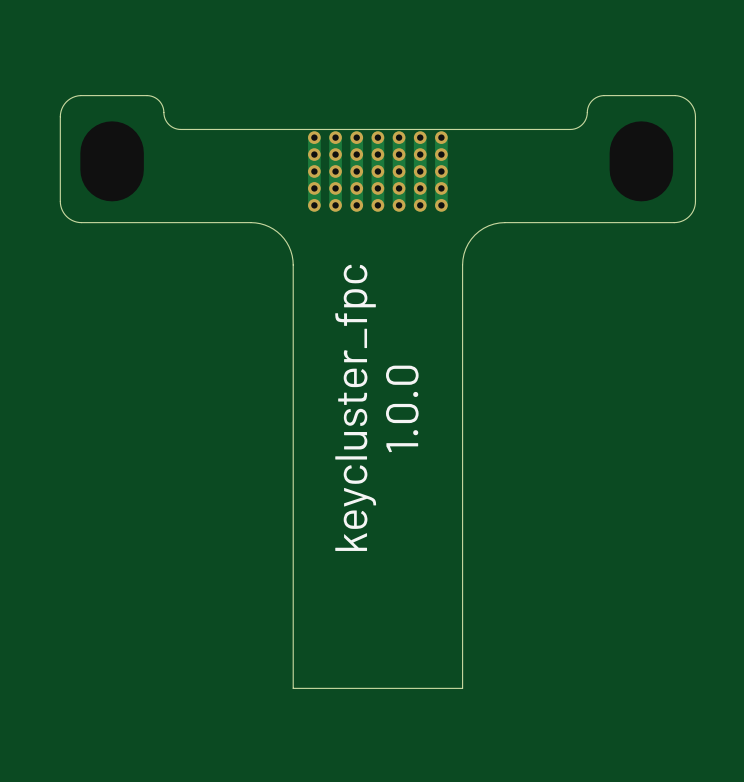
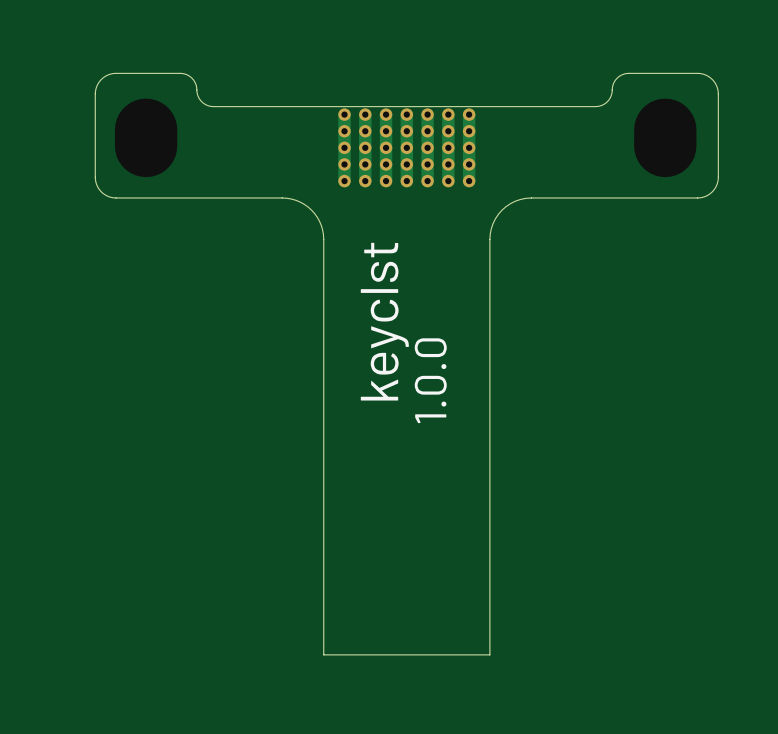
text: keycluster_fpc (355, 407) -> keyclst (384, 321)

